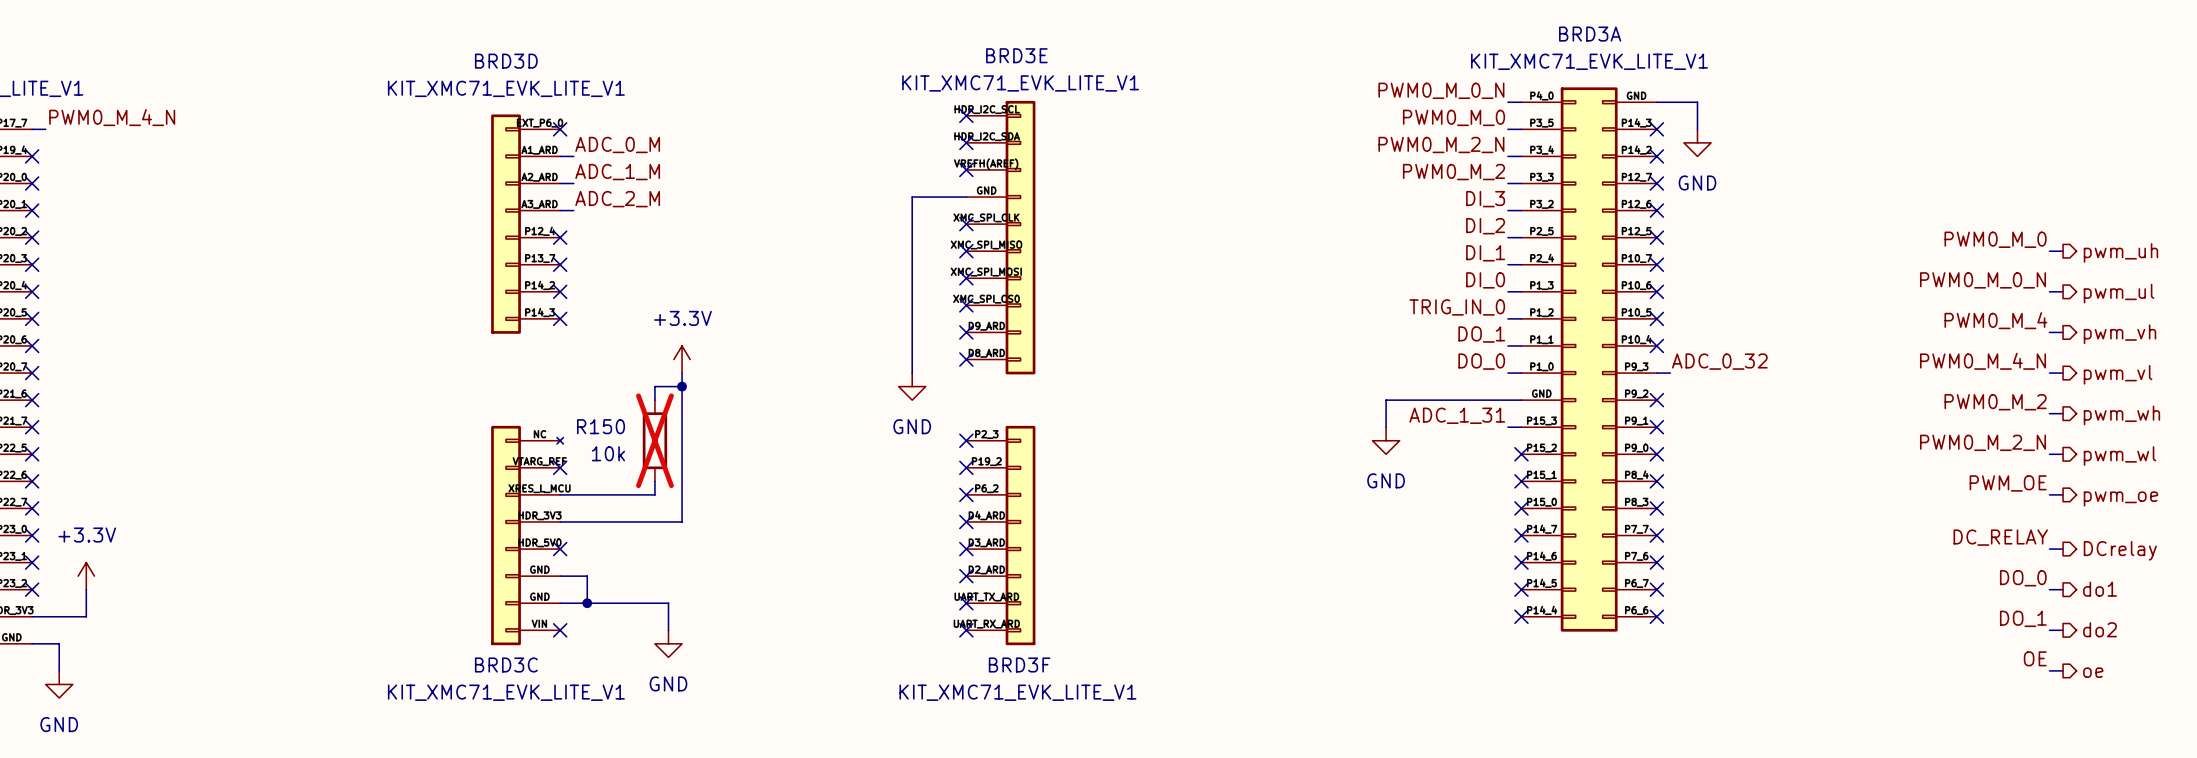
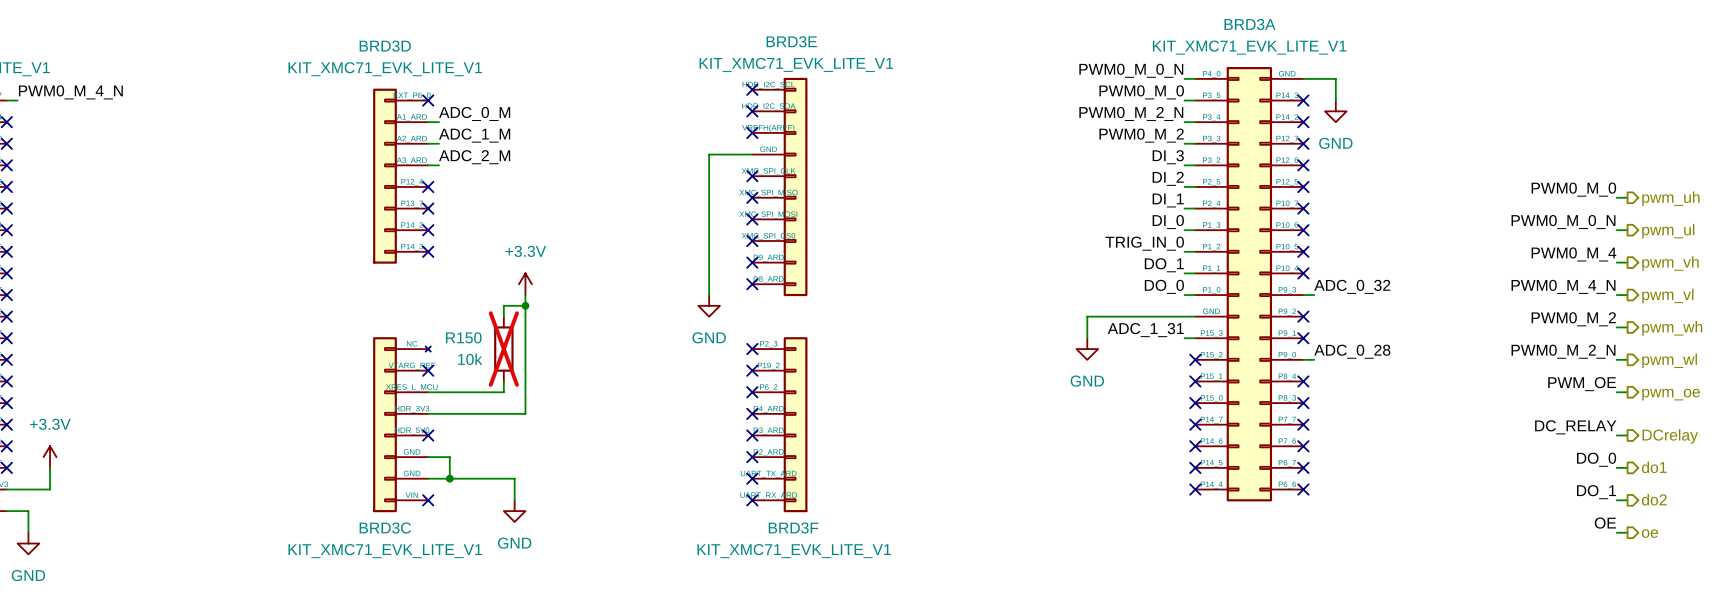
label: none -> ADC_0_28 (1352, 351)
wire: none -> (1303, 359) (1314, 359)
no-connect mark: (1656, 454) -> none

